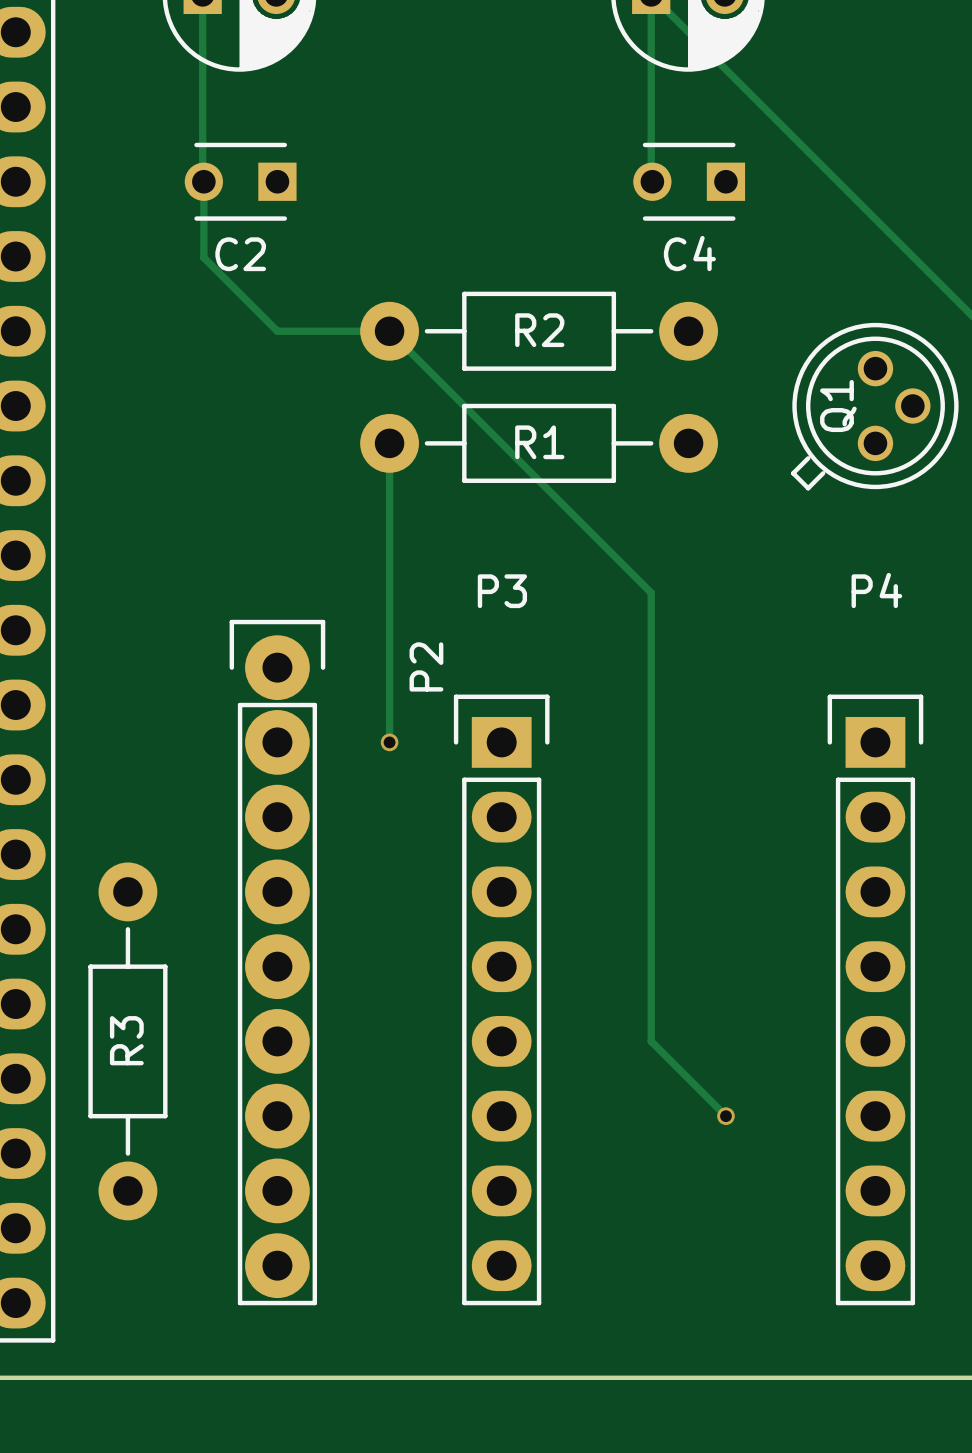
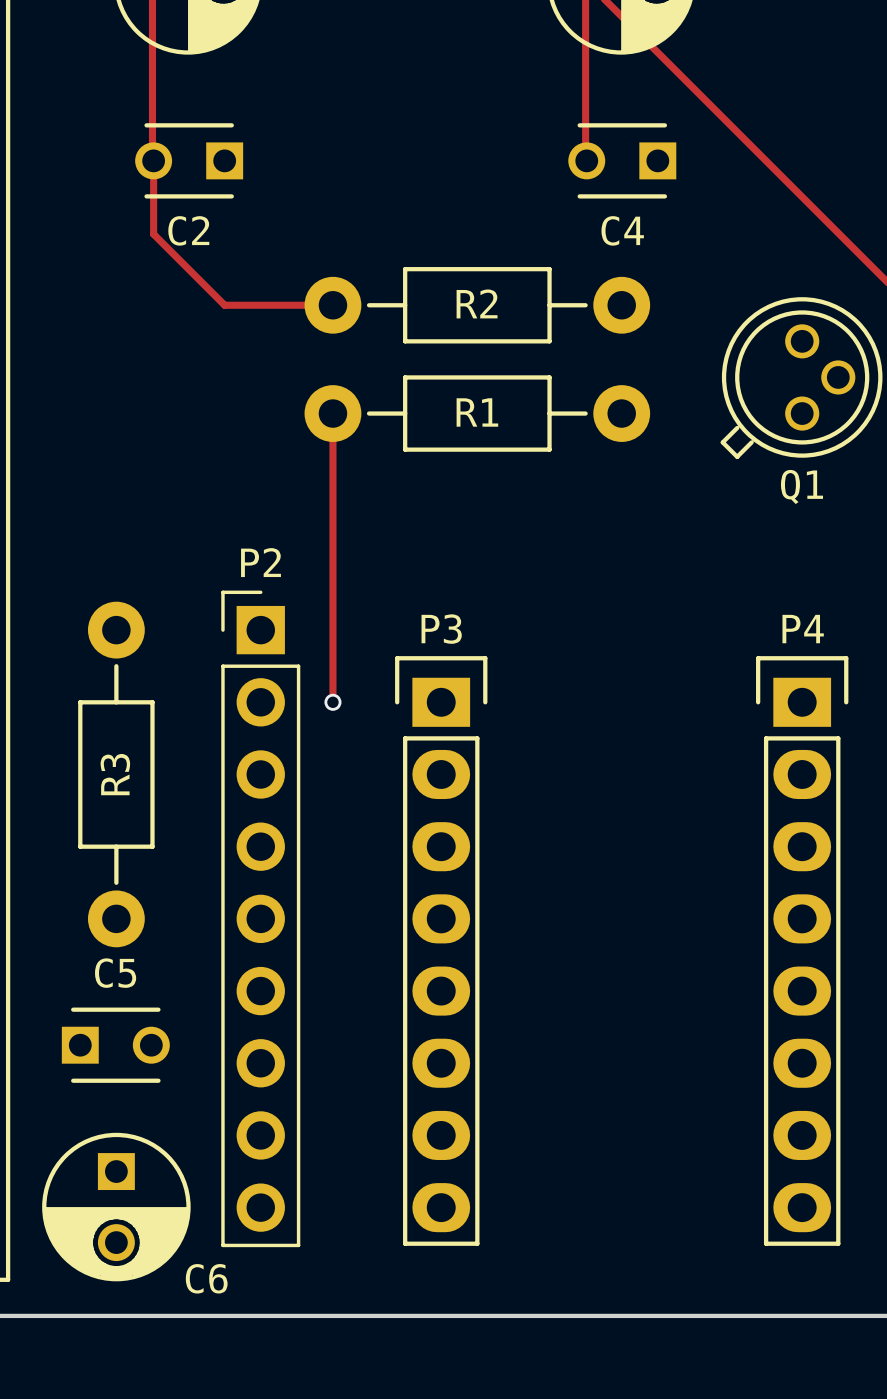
track: (389, 331) (651, 592) (651, 1041) (725, 1116) -> none
Q1 name rotation: 0° (838, 406) -> 90° clockwise (801, 486)
Q1 name position: Q1 (838, 406) -> Q1 (801, 486)
P4 name position: P4 (876, 590) -> P4 (803, 629)
P3 name position: P3 (502, 591) -> P3 (441, 629)
P2 footprint: [229, 619, 326, 1306] -> [221, 590, 301, 1248]
P2 name position: P2 (426, 666) -> P2 (260, 562)
R3 position: (127, 1041) -> (116, 774)
C5: none -> (115, 1045)
via: (725, 1116) -> none
C6: none -> (116, 1207)

